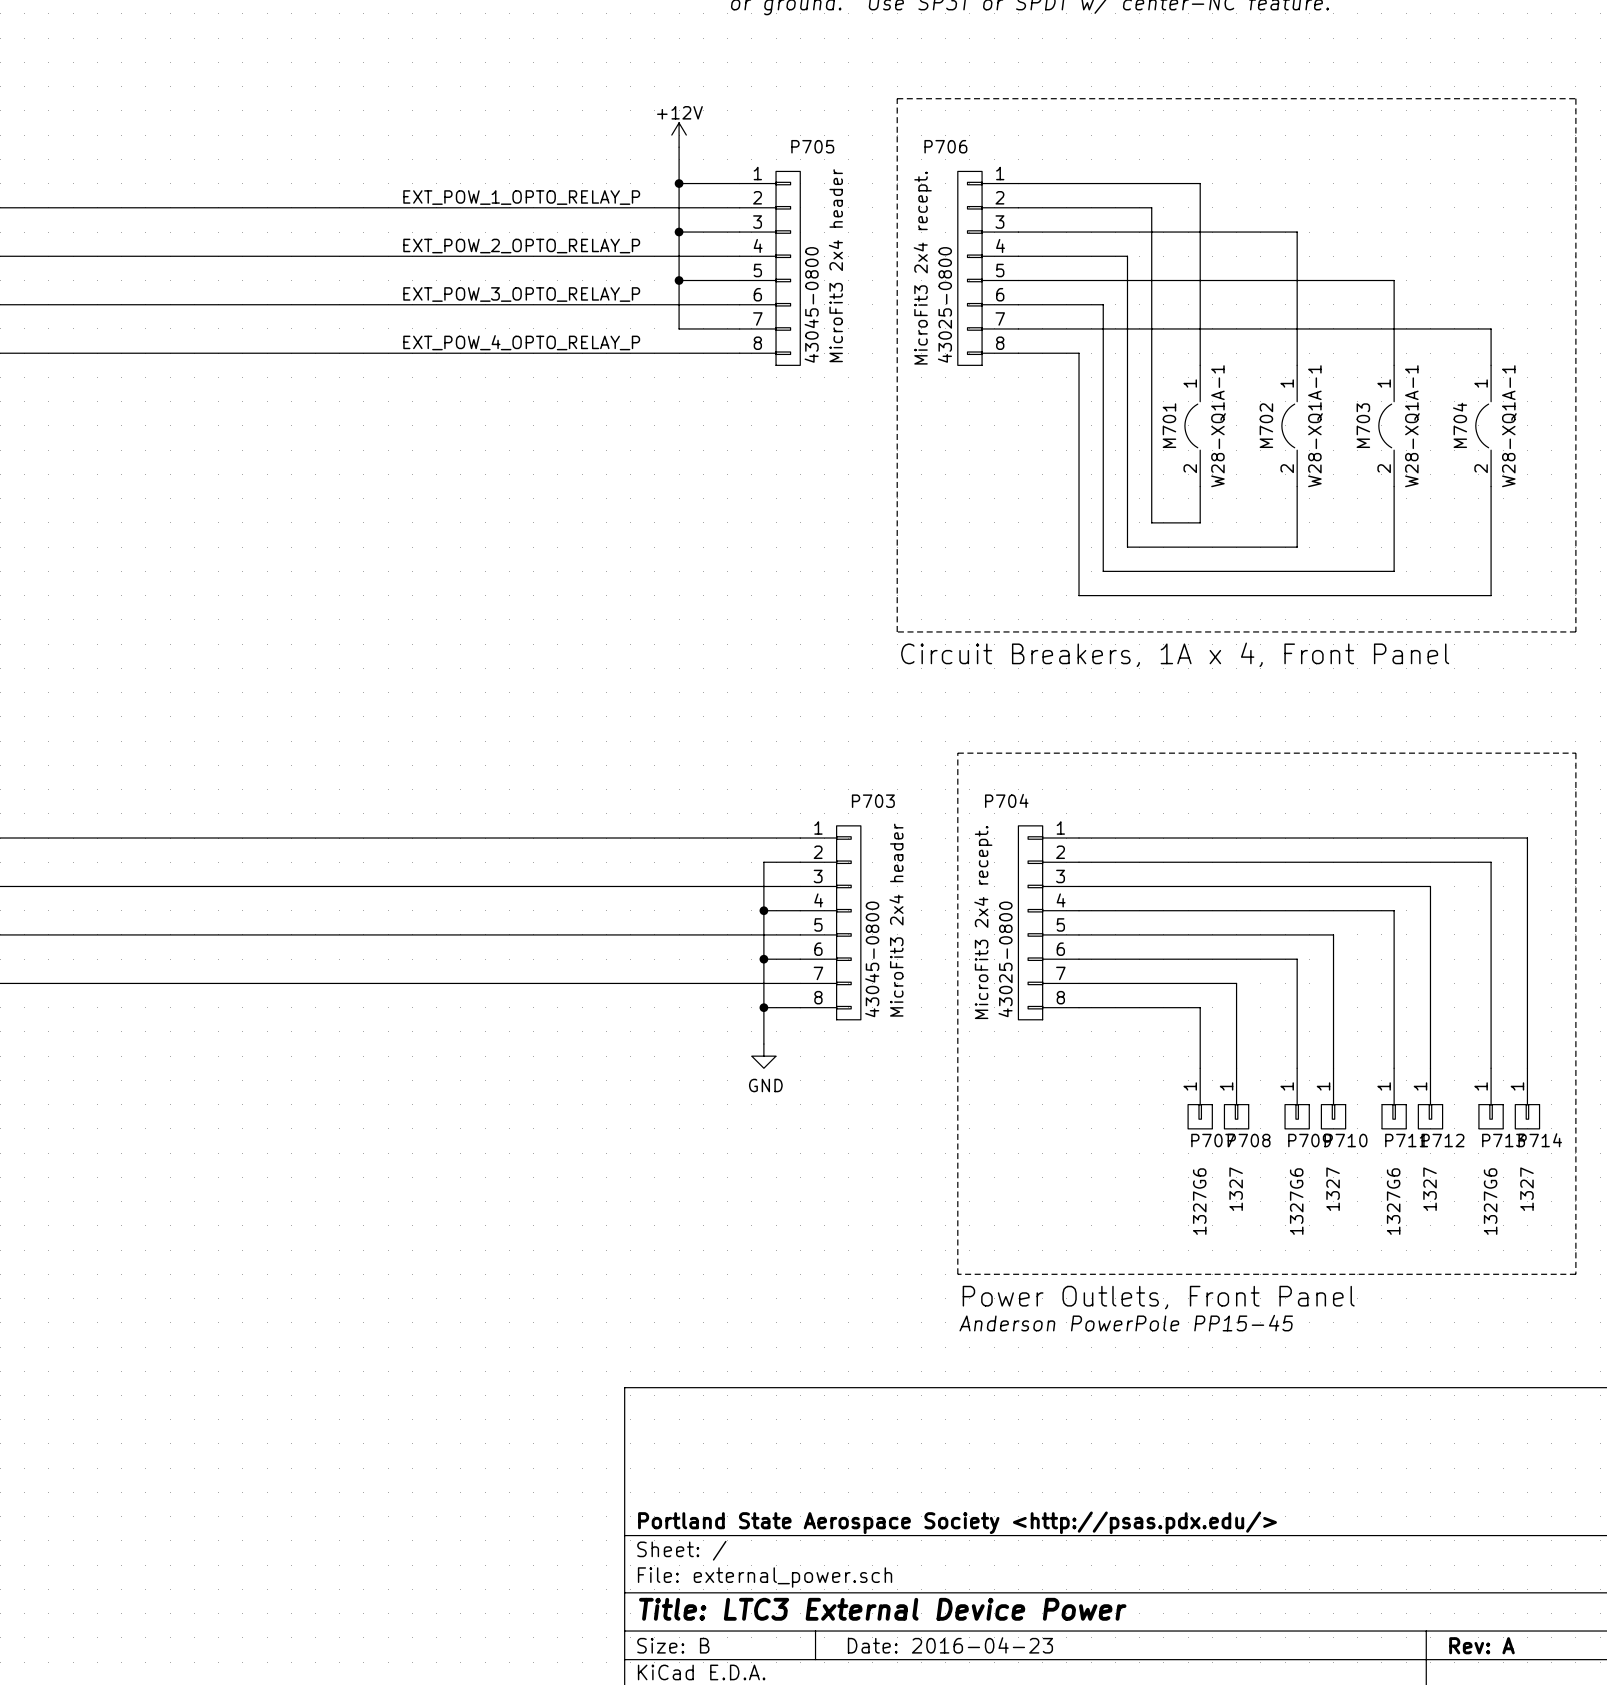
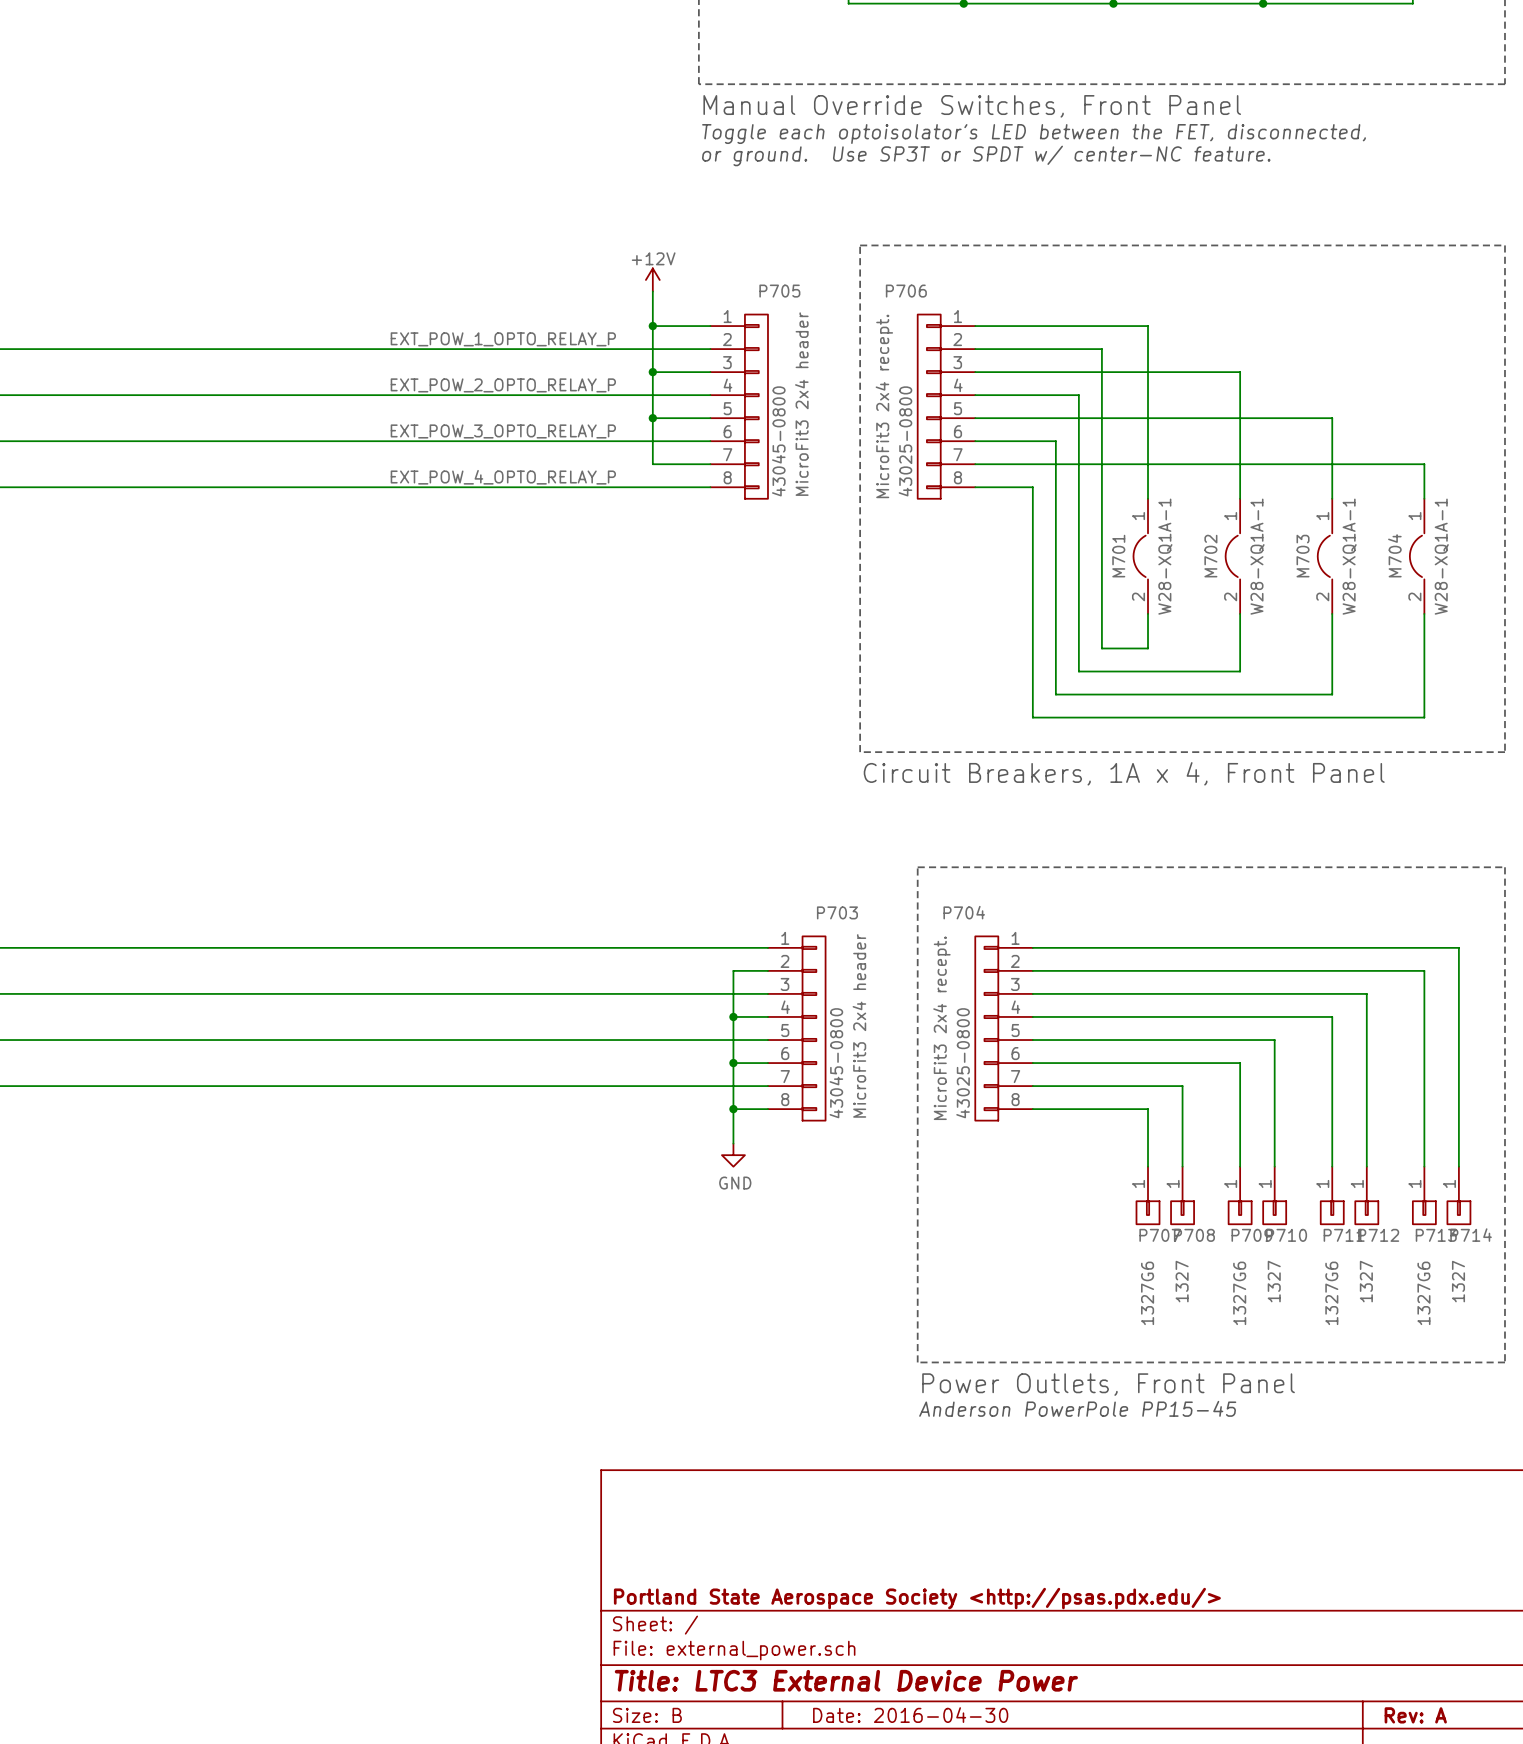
title block: Date: 2016-04-23 (950, 1645) -> Date: 2016-04-30 (910, 1715)

